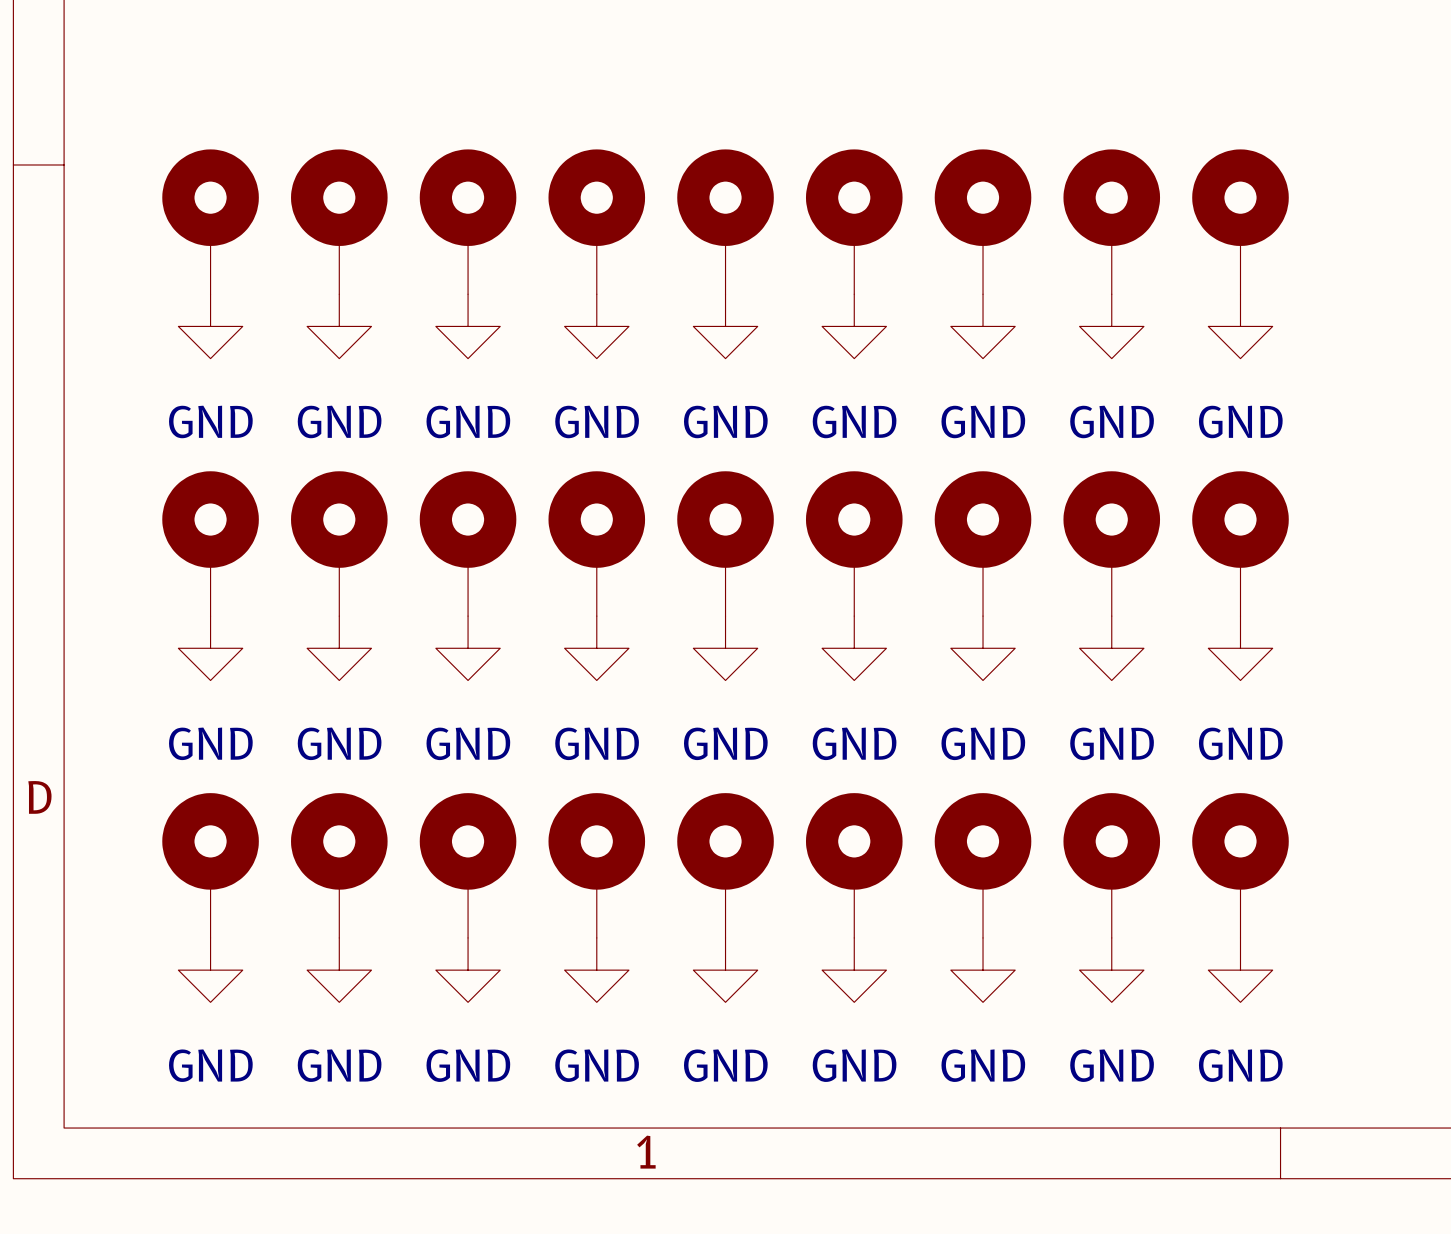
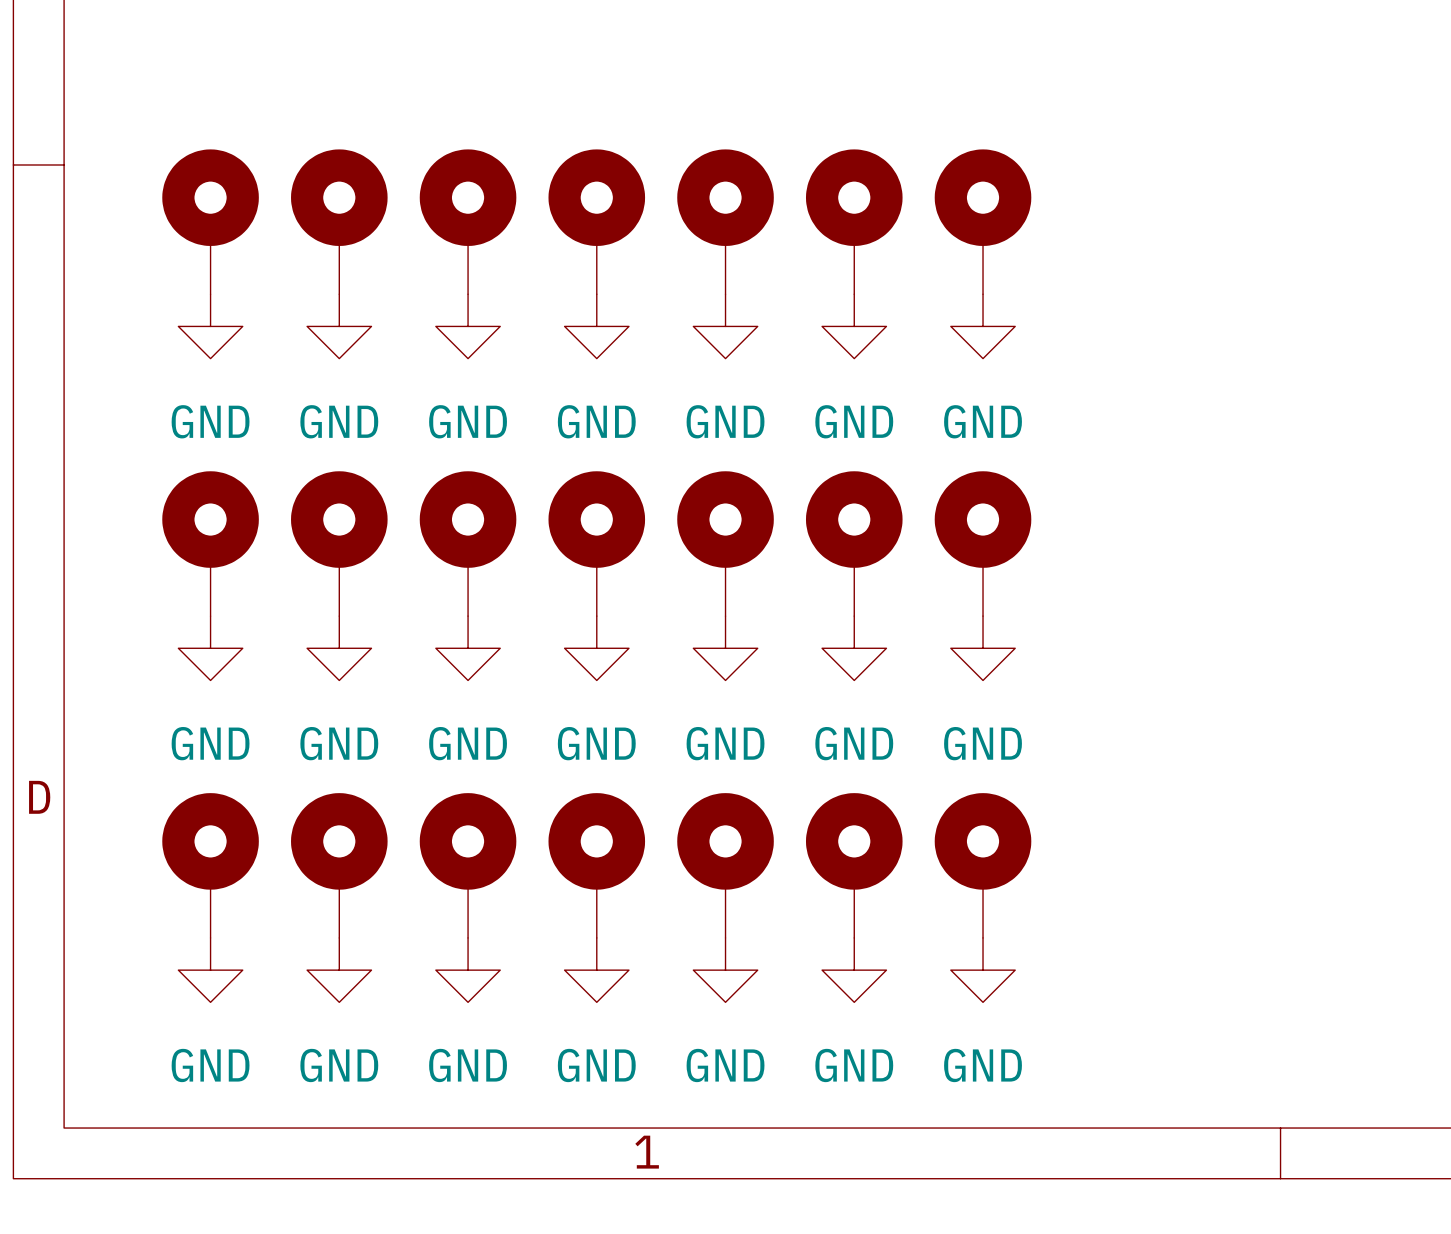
part: (1111, 221) -> none
part: (1240, 221) -> none
power symbol: GND (1111, 326) -> none
power symbol: GND (1240, 326) -> none
part: (1111, 543) -> none
part: (1240, 543) -> none
power symbol: GND (1111, 648) -> none
power symbol: GND (1240, 648) -> none
part: (1111, 865) -> none
part: (1240, 865) -> none
power symbol: GND (1111, 970) -> none
power symbol: GND (1240, 970) -> none

